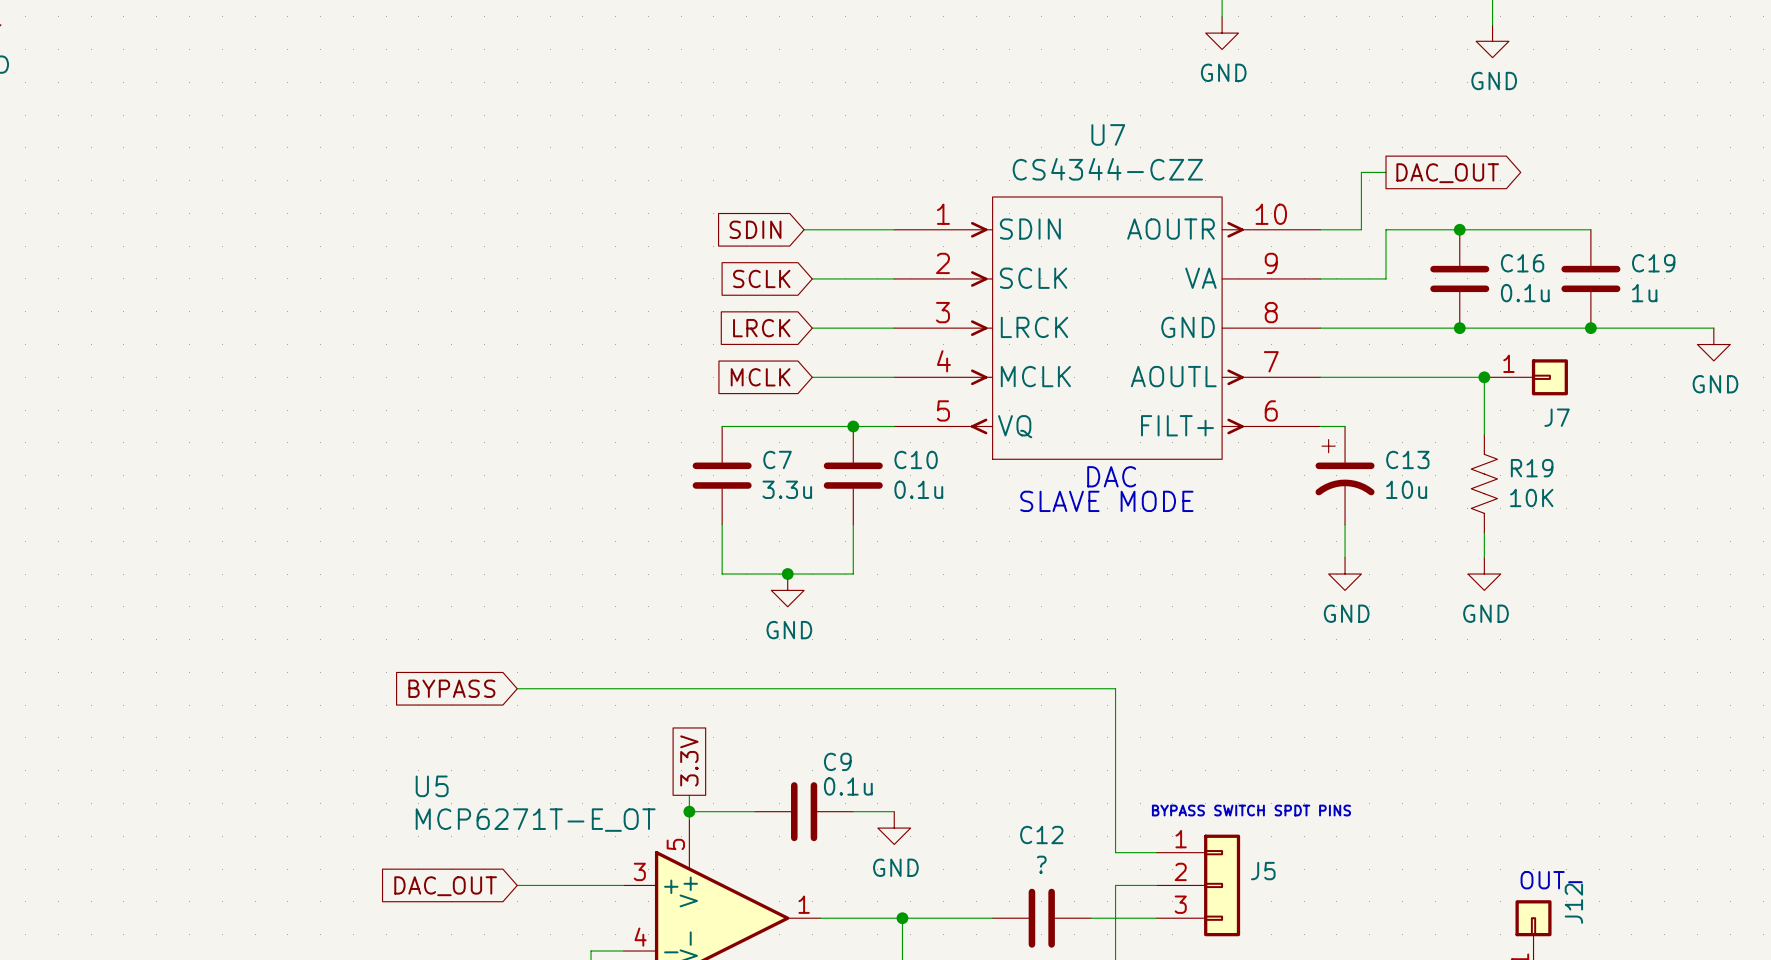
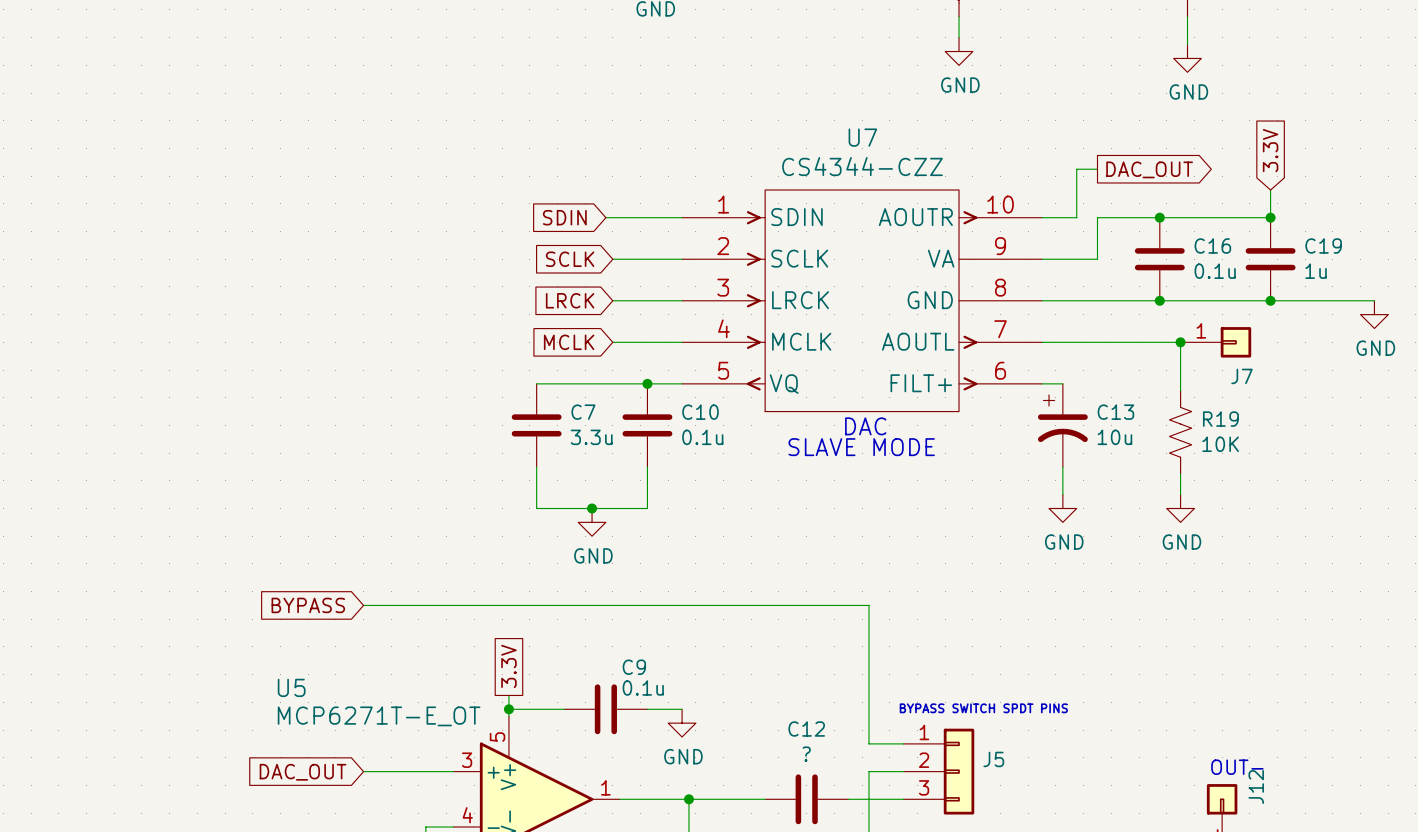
global label: none -> 3.3V (1270, 150)
wire: none -> (1270, 190) (1270, 217)
junction: none -> (1270, 217)

